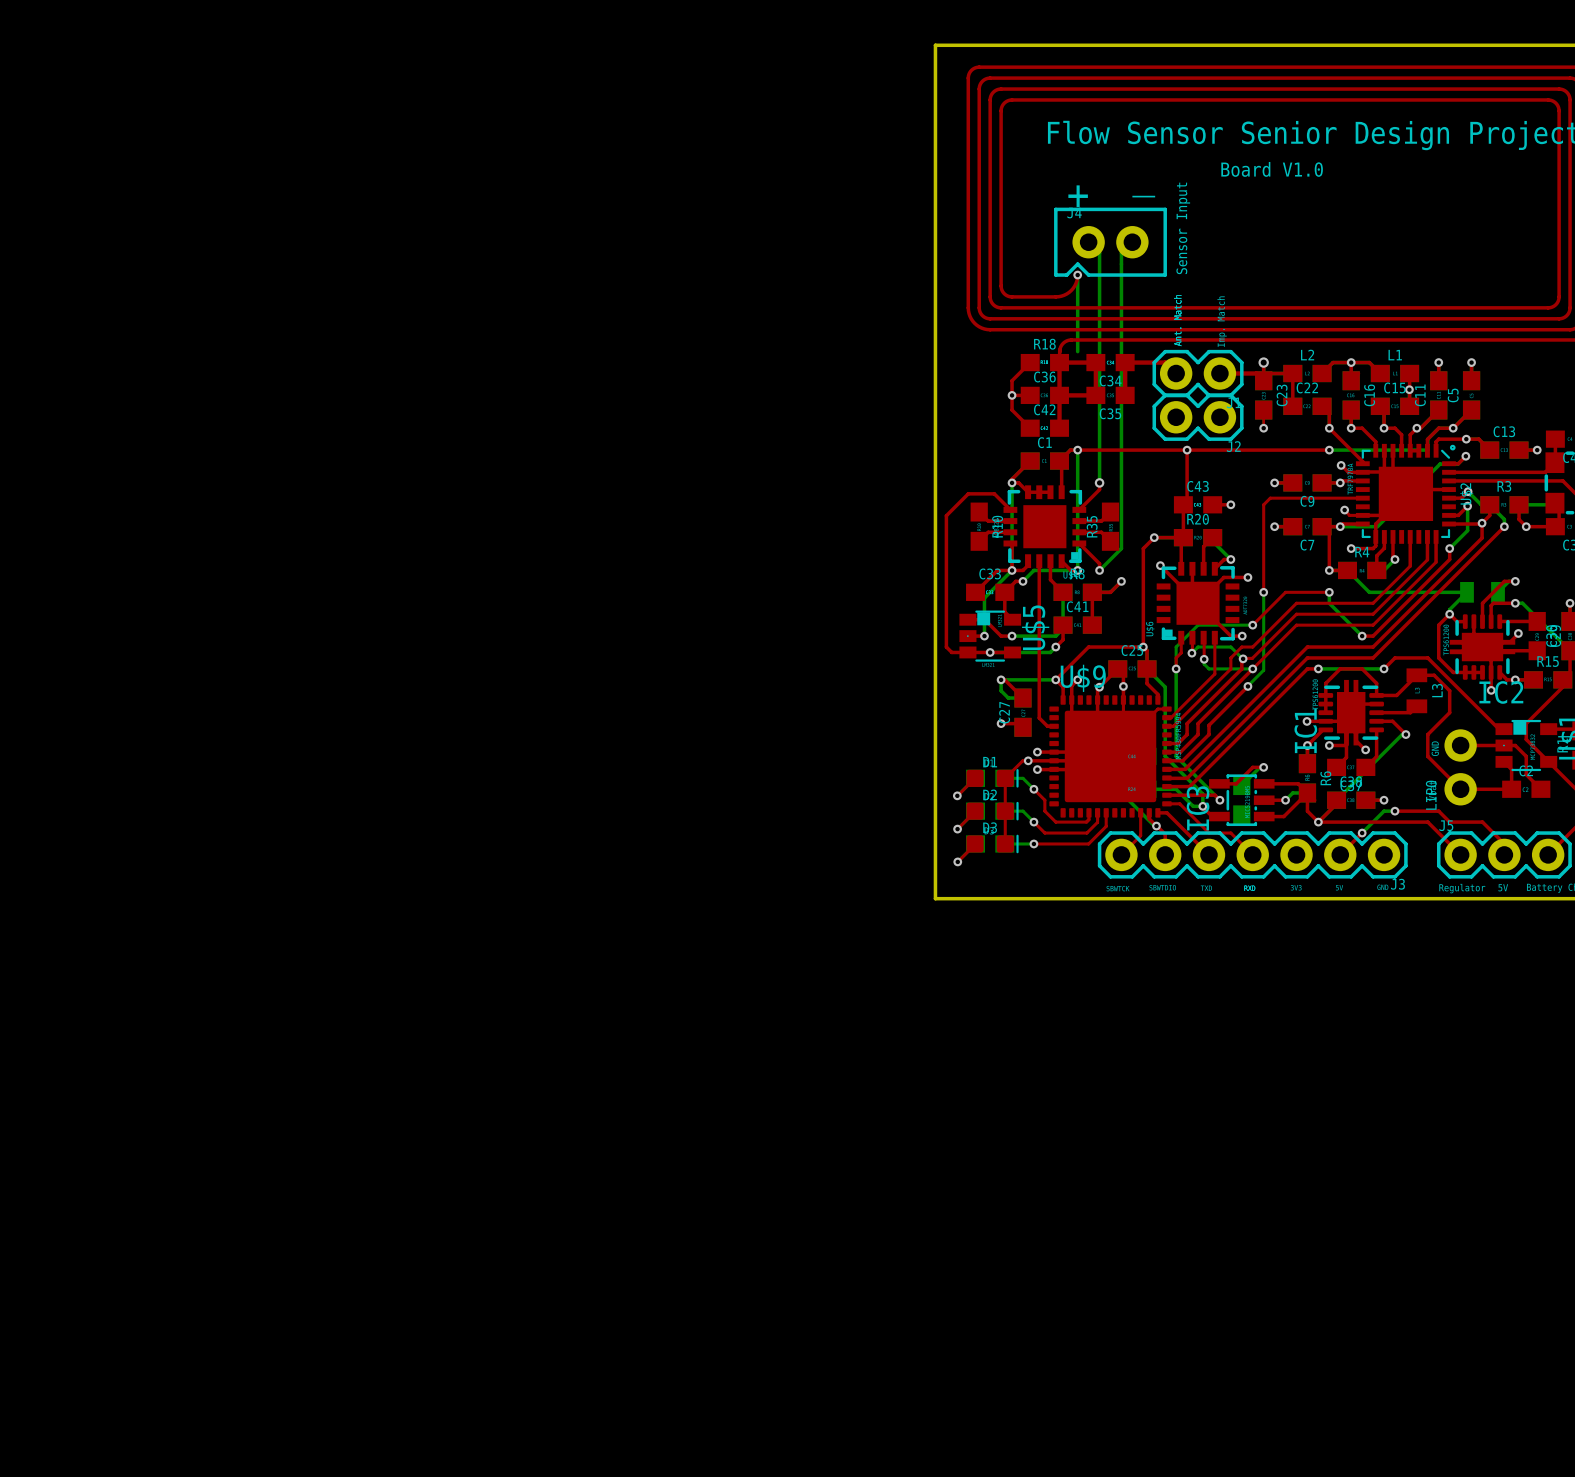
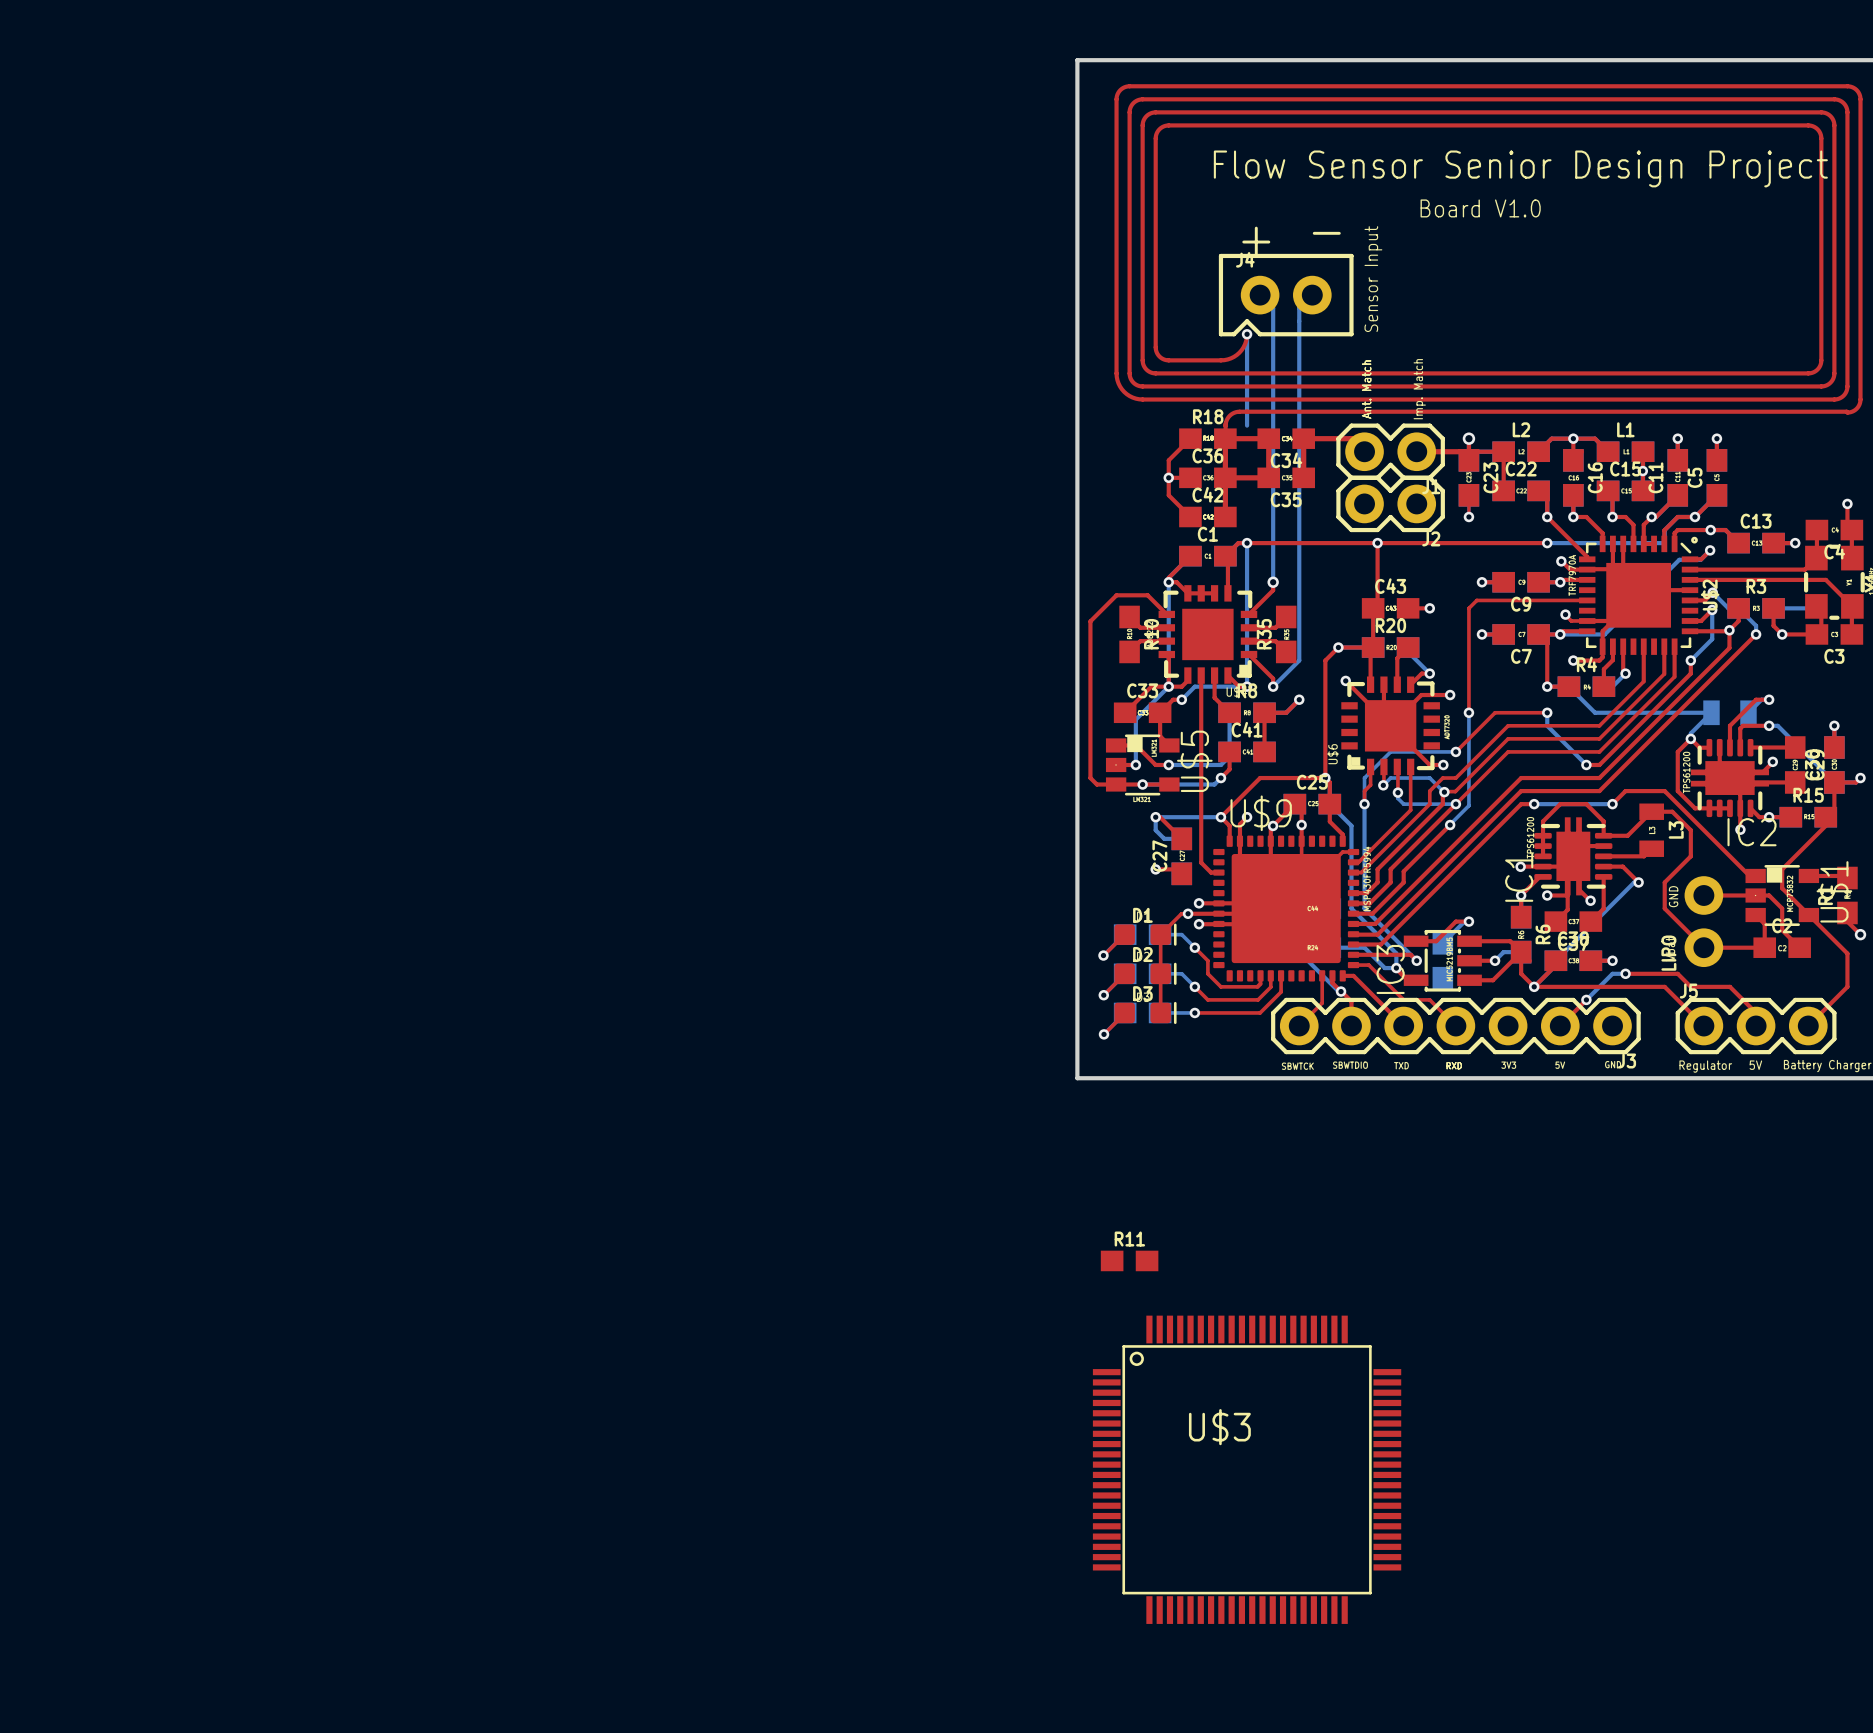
R11: none -> (1129, 1260)
U$3: none -> (1247, 1469)

